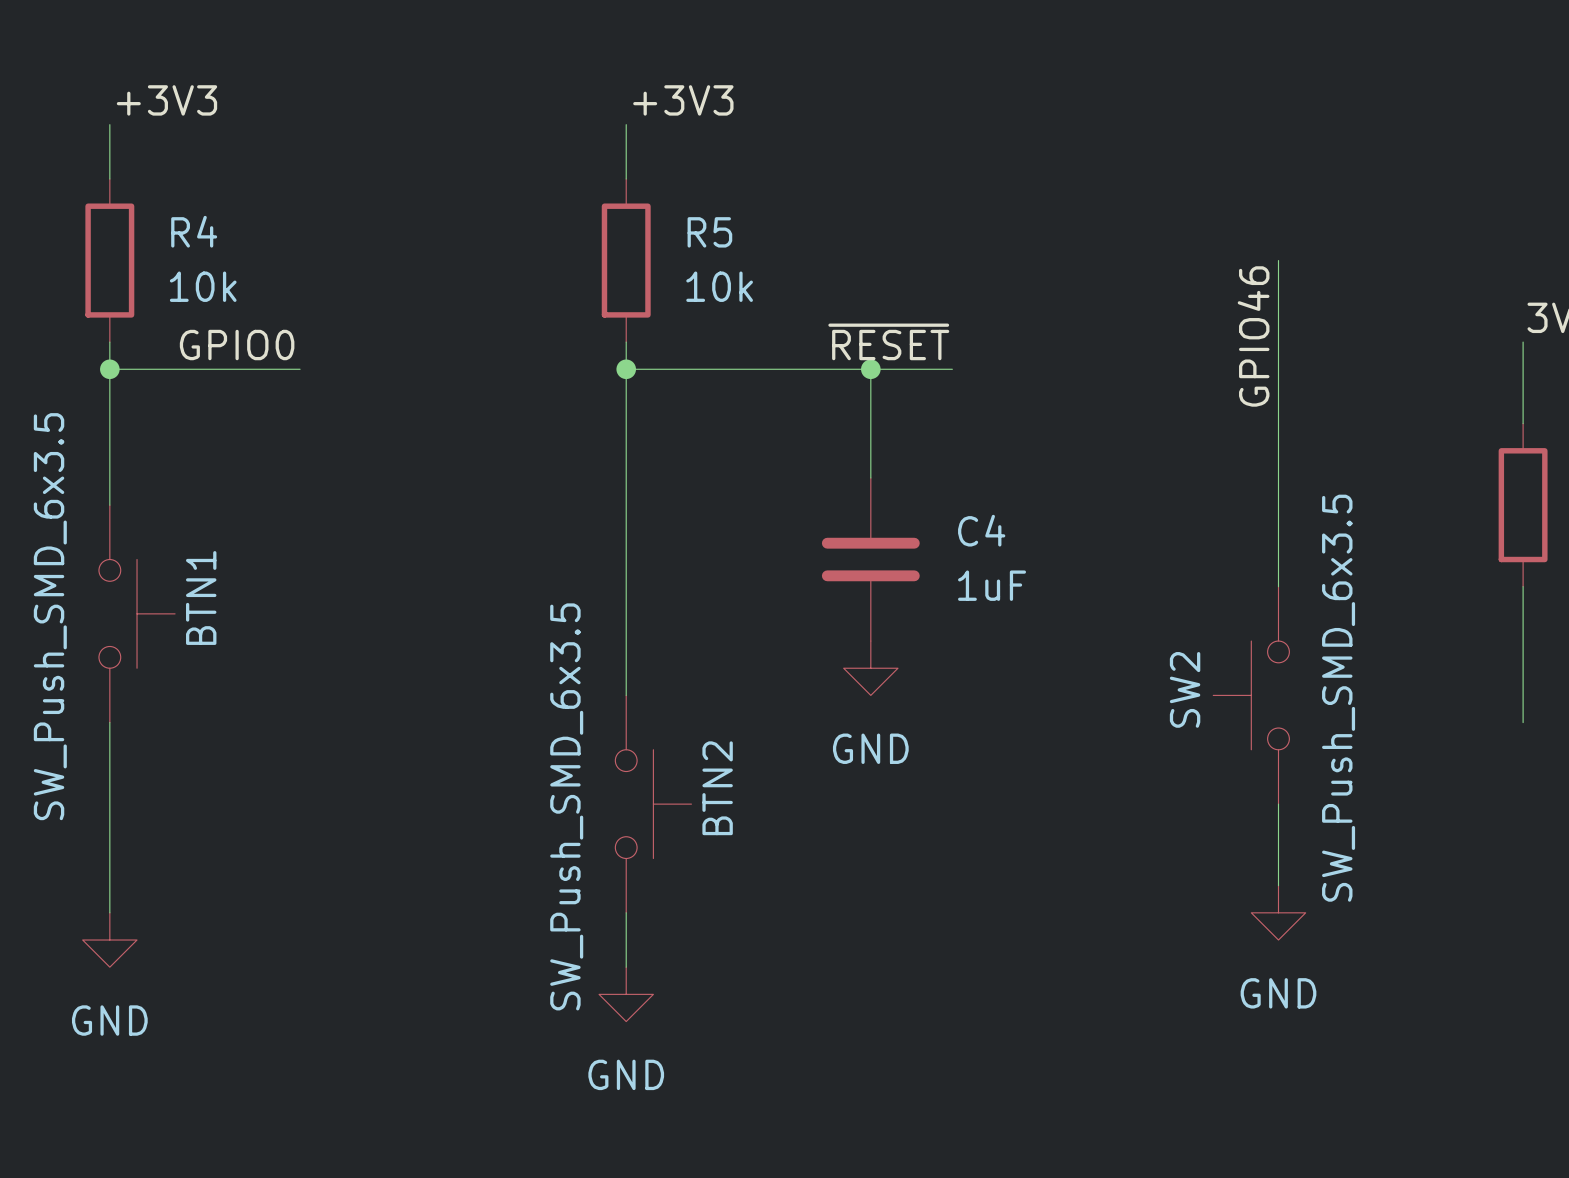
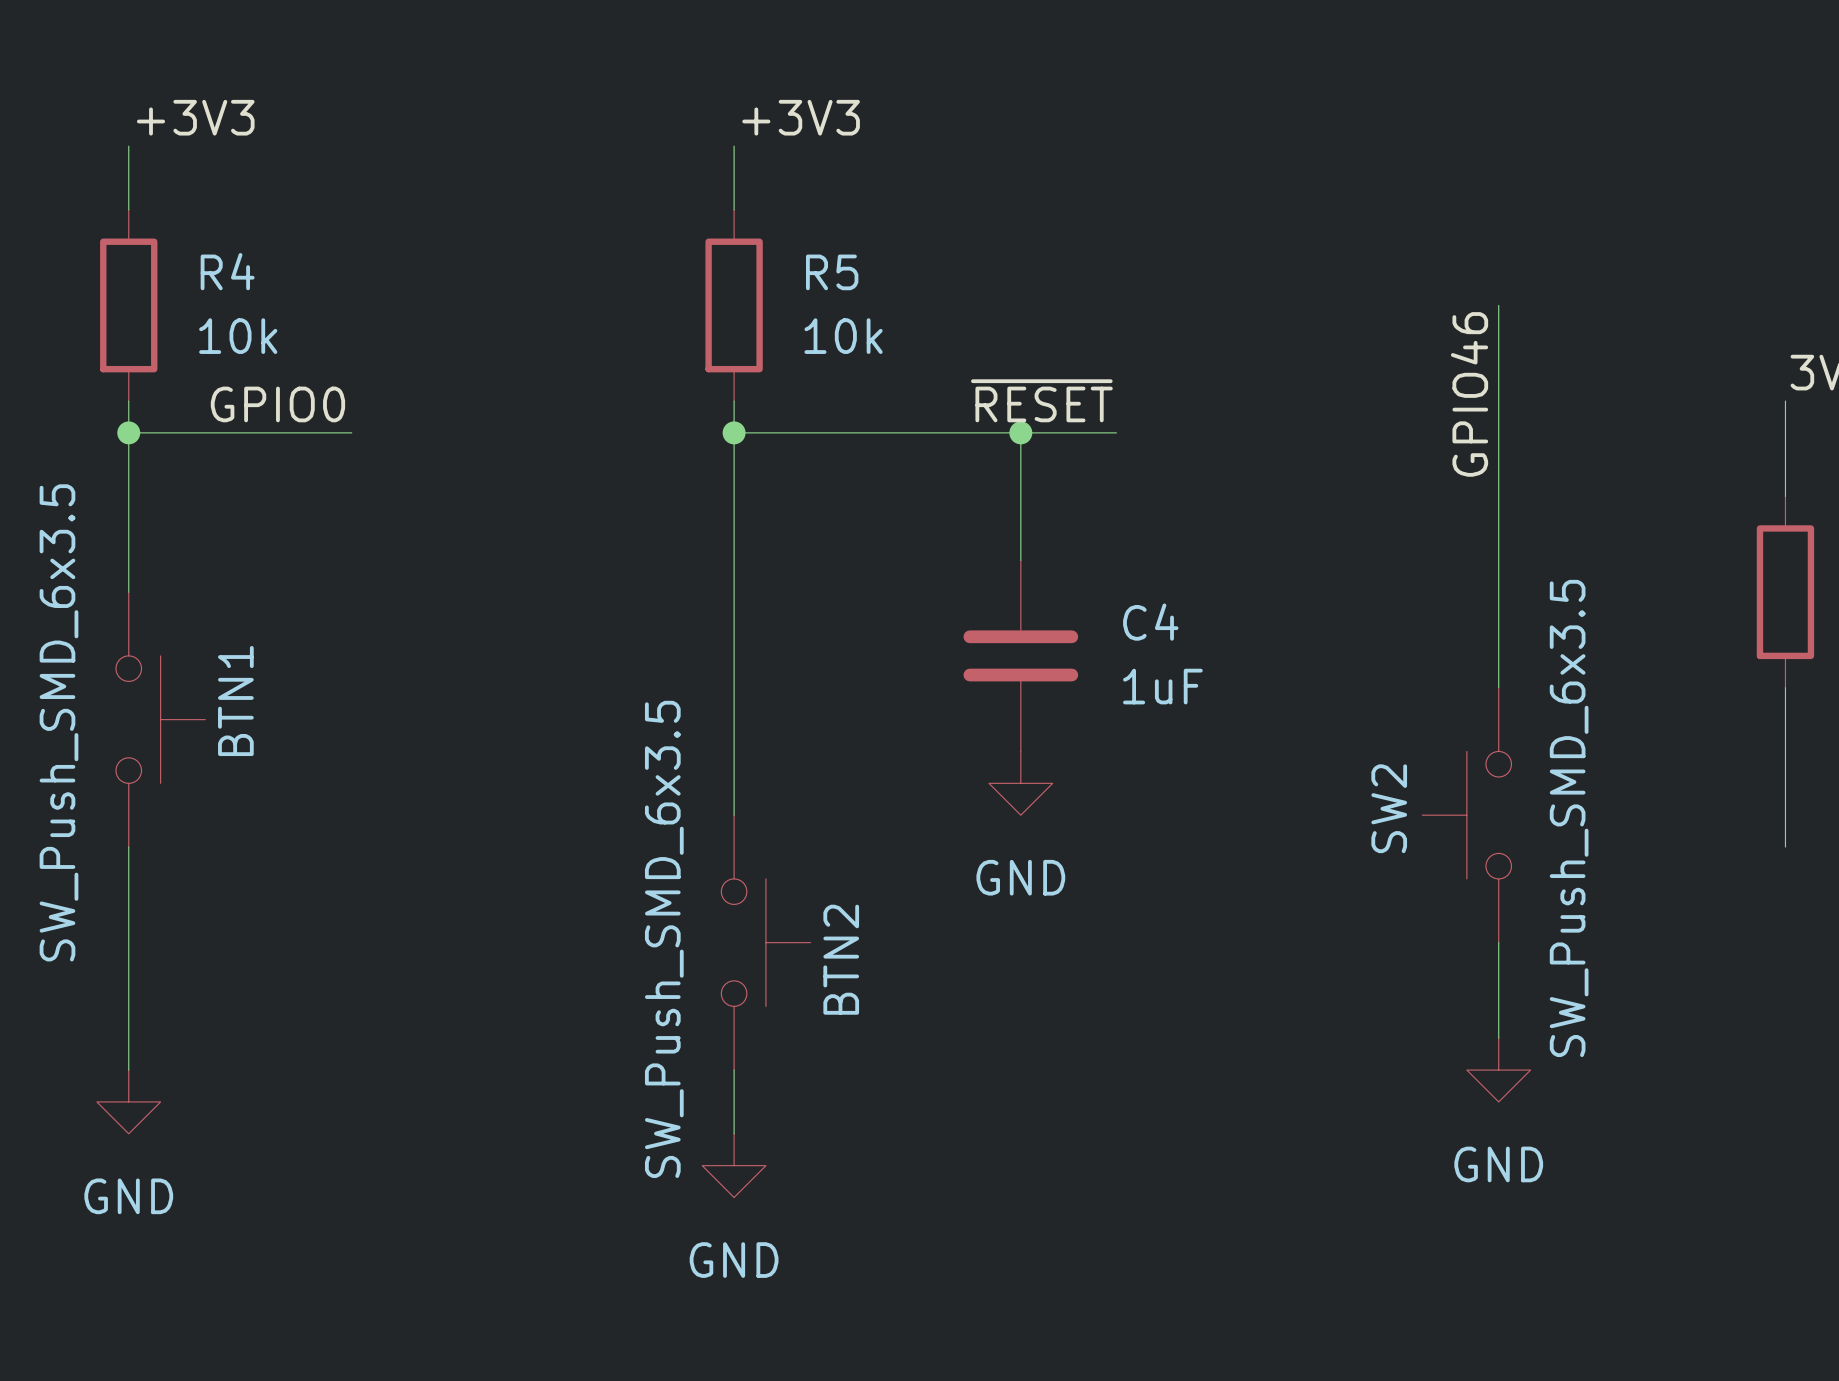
BTN2 name position: BTN2 (717, 788) -> BTN2 (841, 959)
BTN2 value position: SW_Push_SMD_6x3.5 (566, 806) -> SW_Push_SMD_6x3.5 (664, 939)

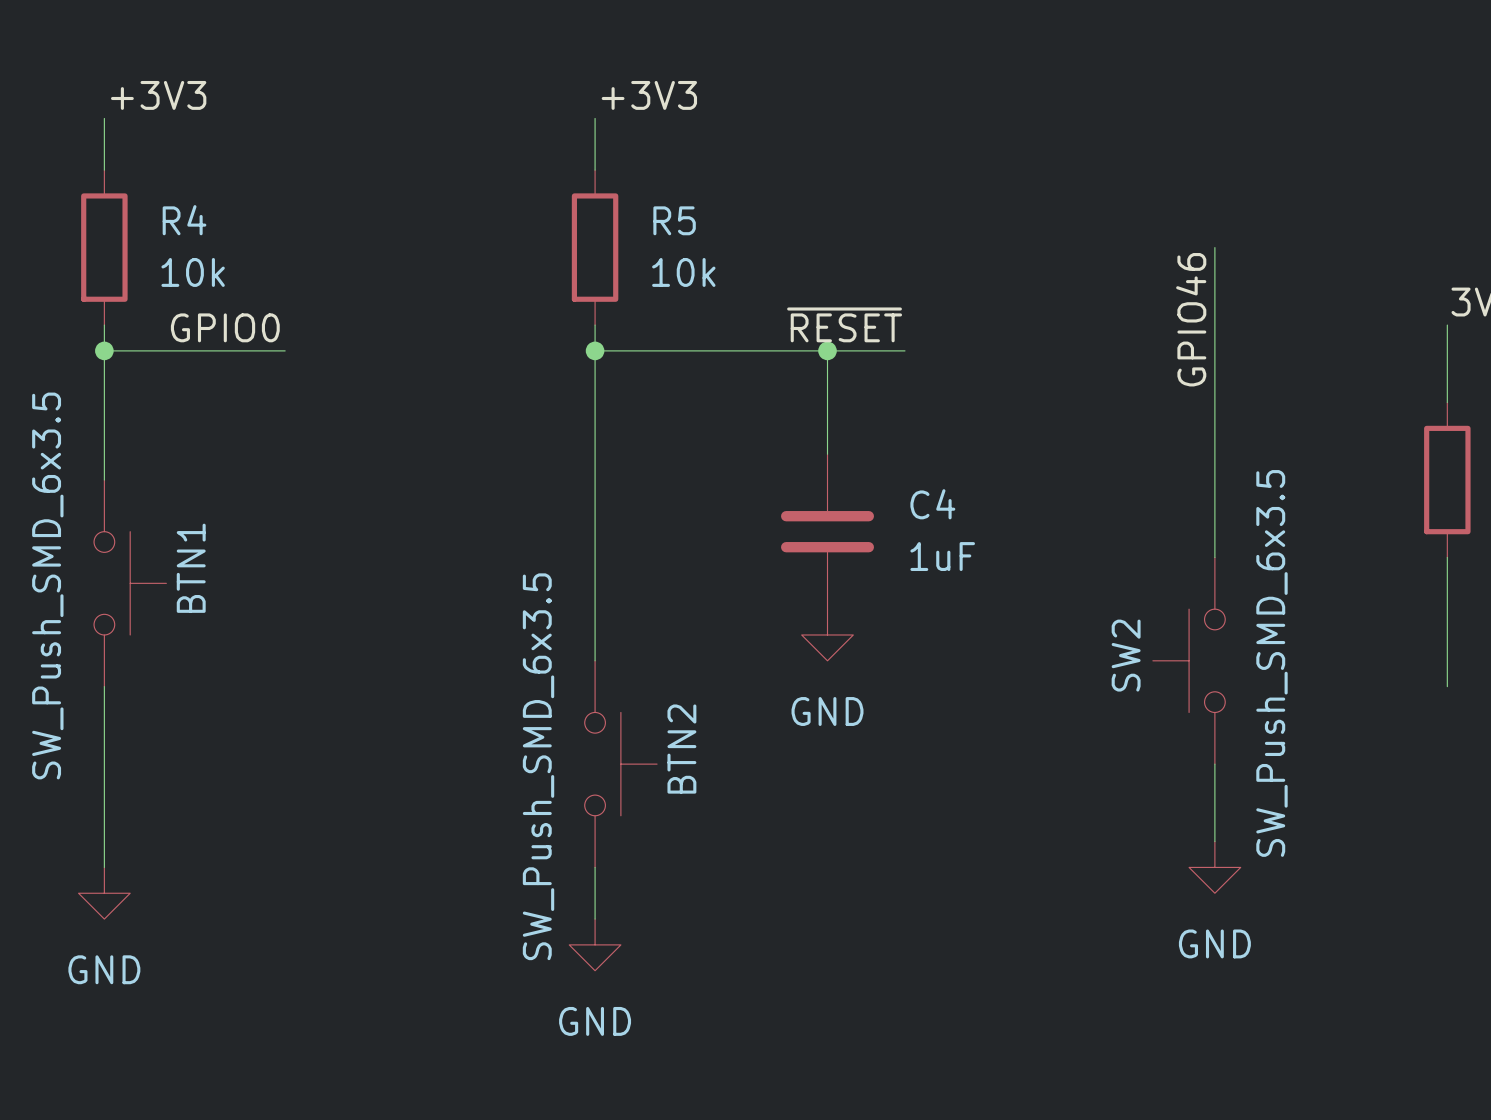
BTN2 value position: SW_Push_SMD_6x3.5 (664, 939) -> SW_Push_SMD_6x3.5 (538, 766)
BTN2 name position: BTN2 (841, 959) -> BTN2 (681, 749)

